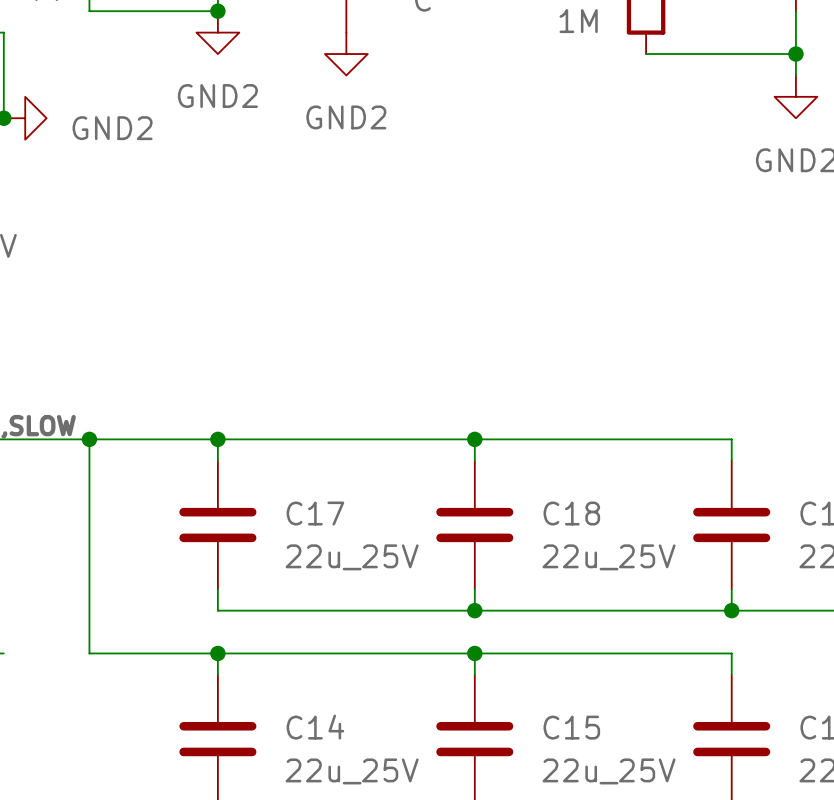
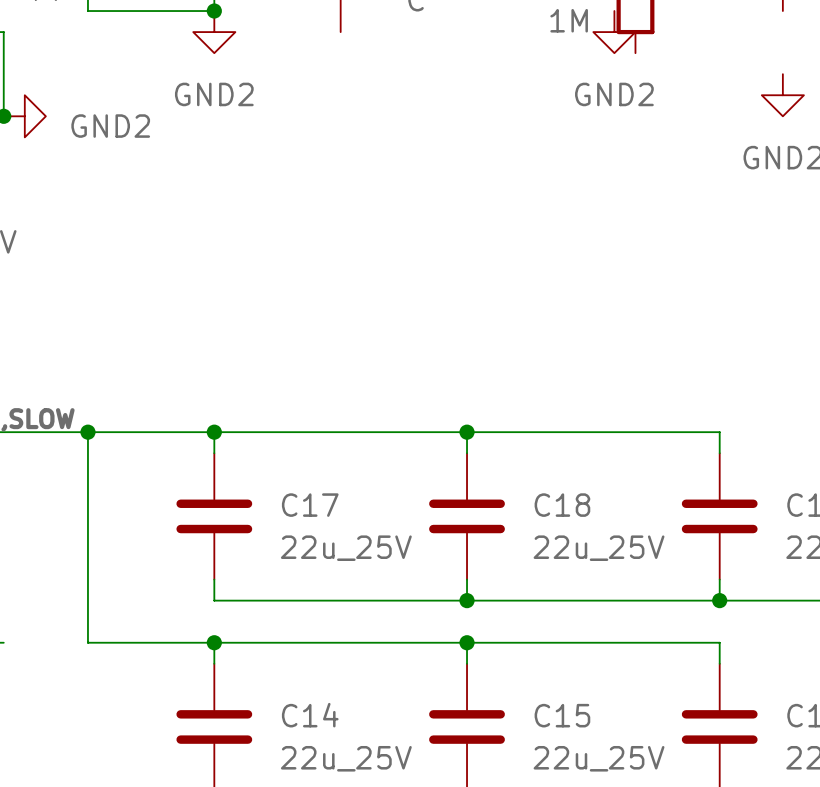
wire: (795, 11) (795, 75) -> none
power symbol position: GND2 (346, 54) -> GND2 (614, 32)
wire: (646, 54) (795, 54) -> none
junction: (795, 54) -> none

